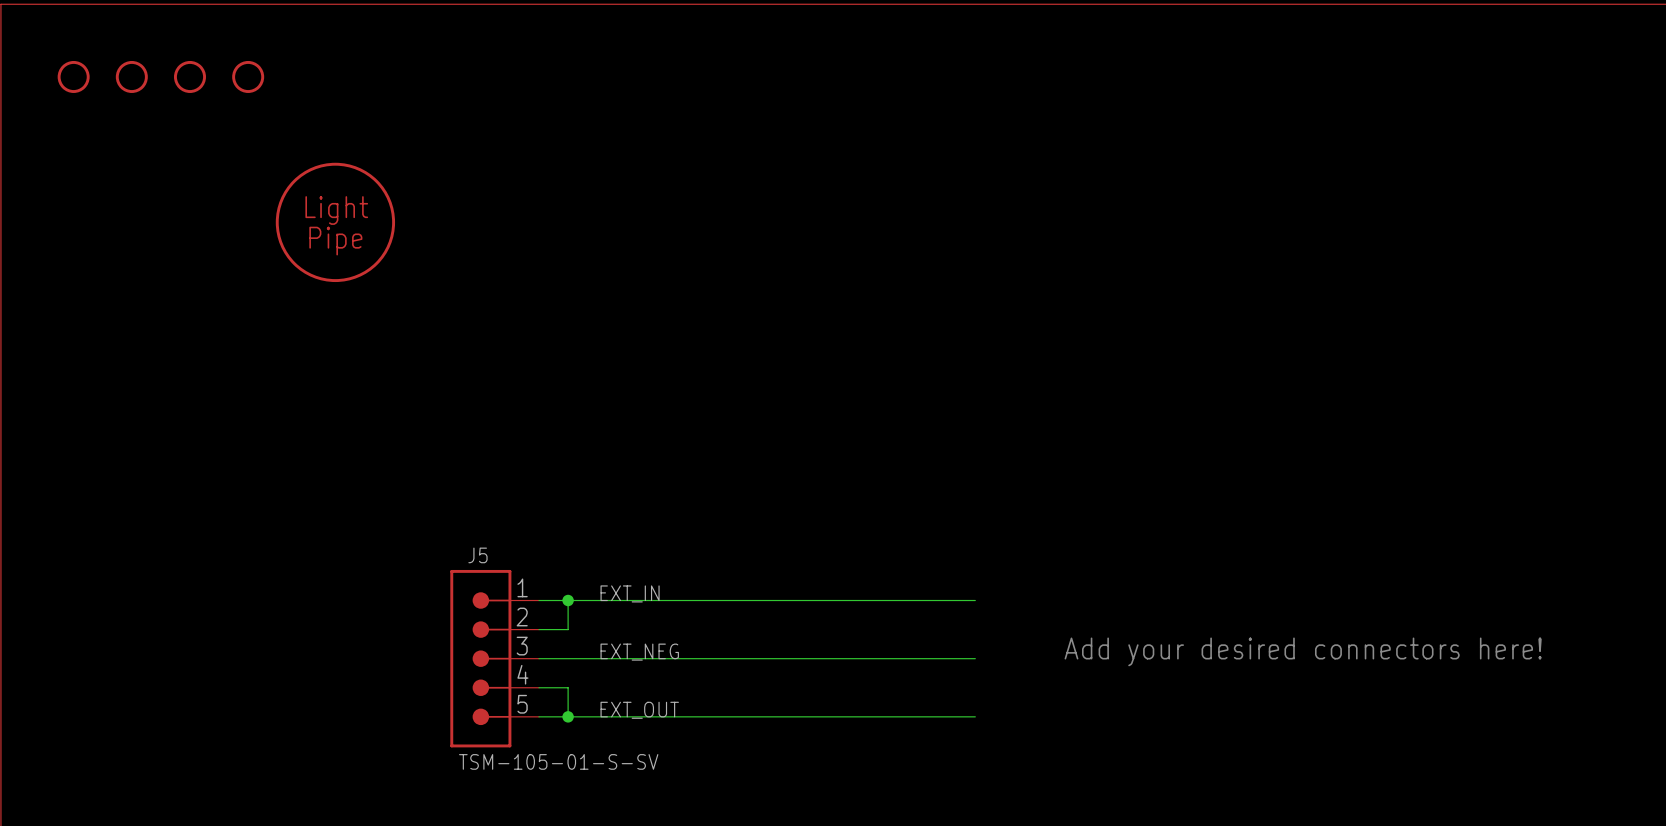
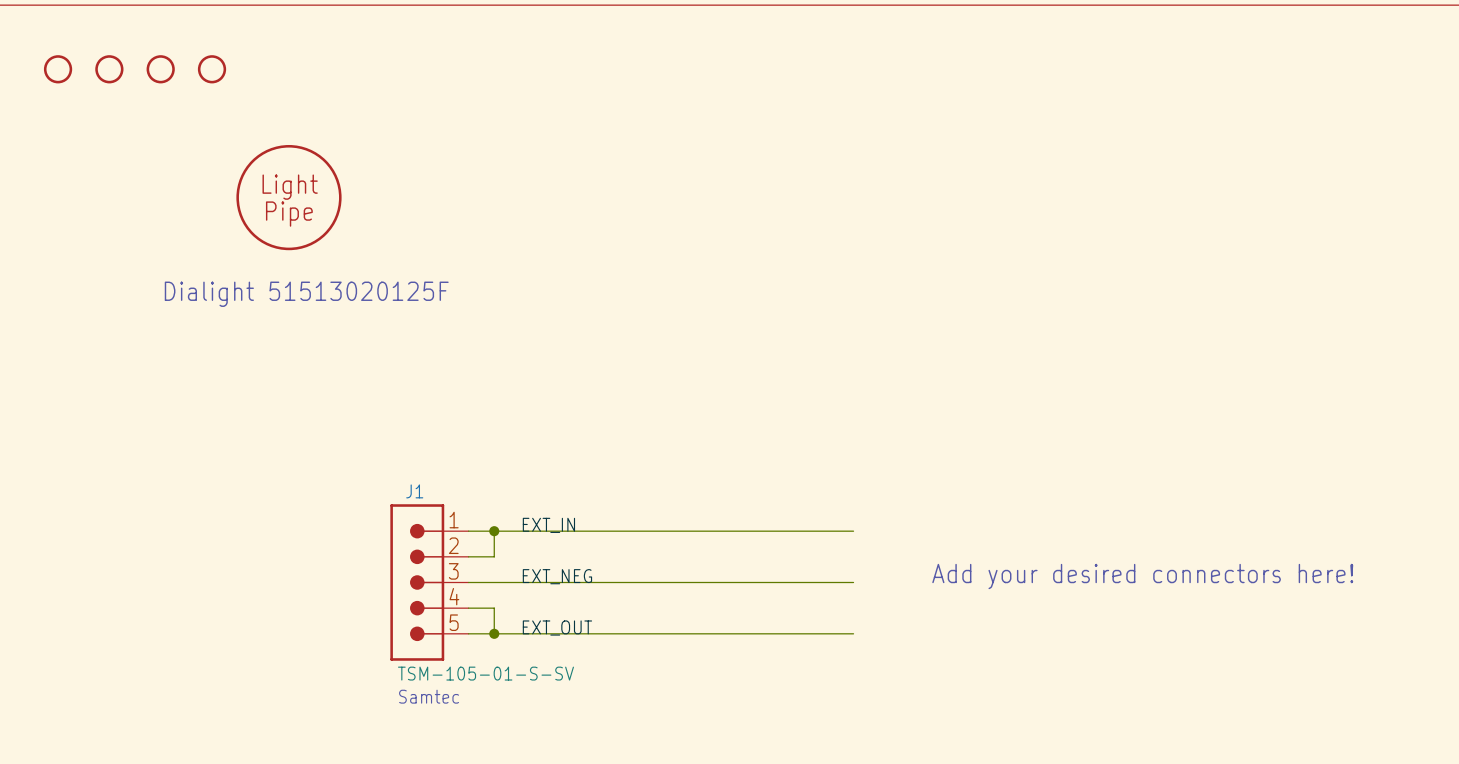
text: none -> Dialight 51513020125F (306, 294)
J5 name: J5 (477, 555) -> J1 (414, 491)
text: none -> Samtec (429, 696)

